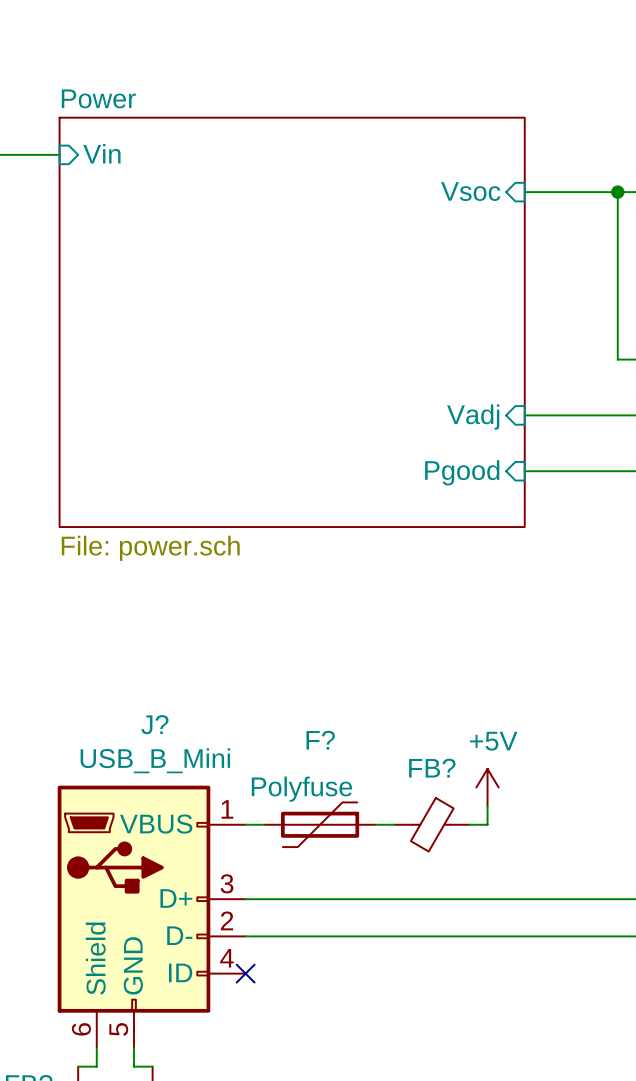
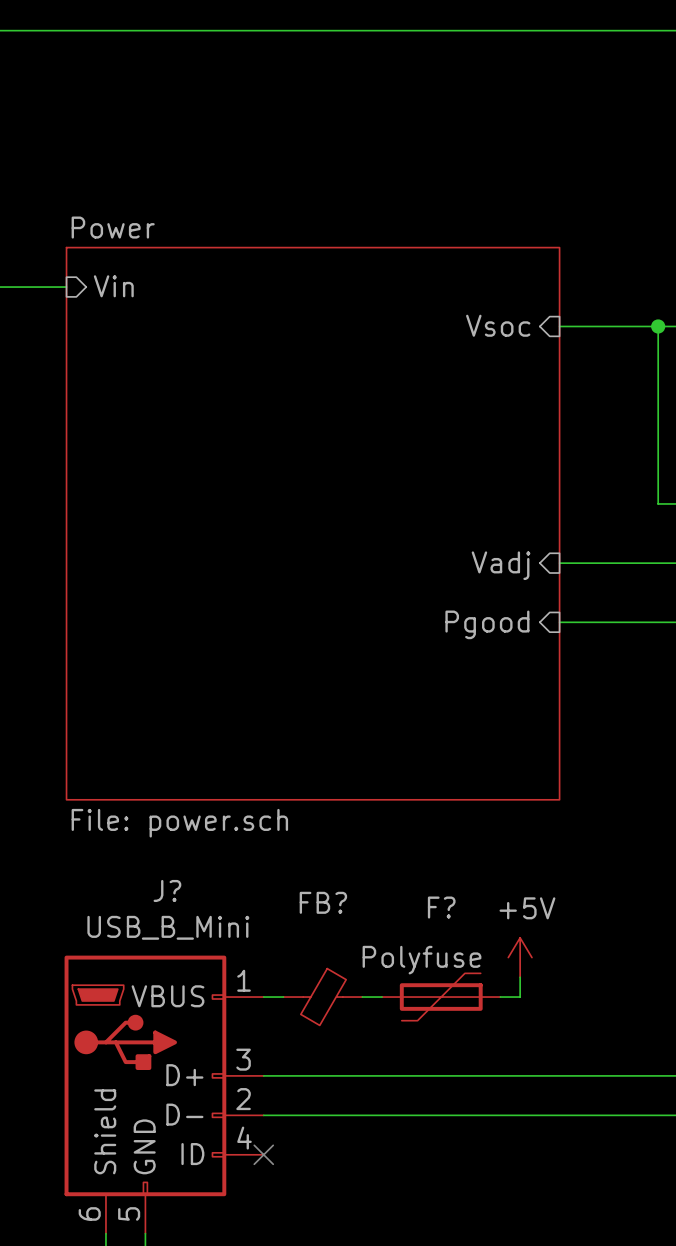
sheet Power: File: power.sch (292, 322) -> none
sheet Power: none -> File: power.sch (313, 523)
FB? name position: FB? (432, 768) -> FB? (323, 902)
F? position: (320, 824) -> (441, 997)
FB? position: (431, 824) -> (322, 997)

